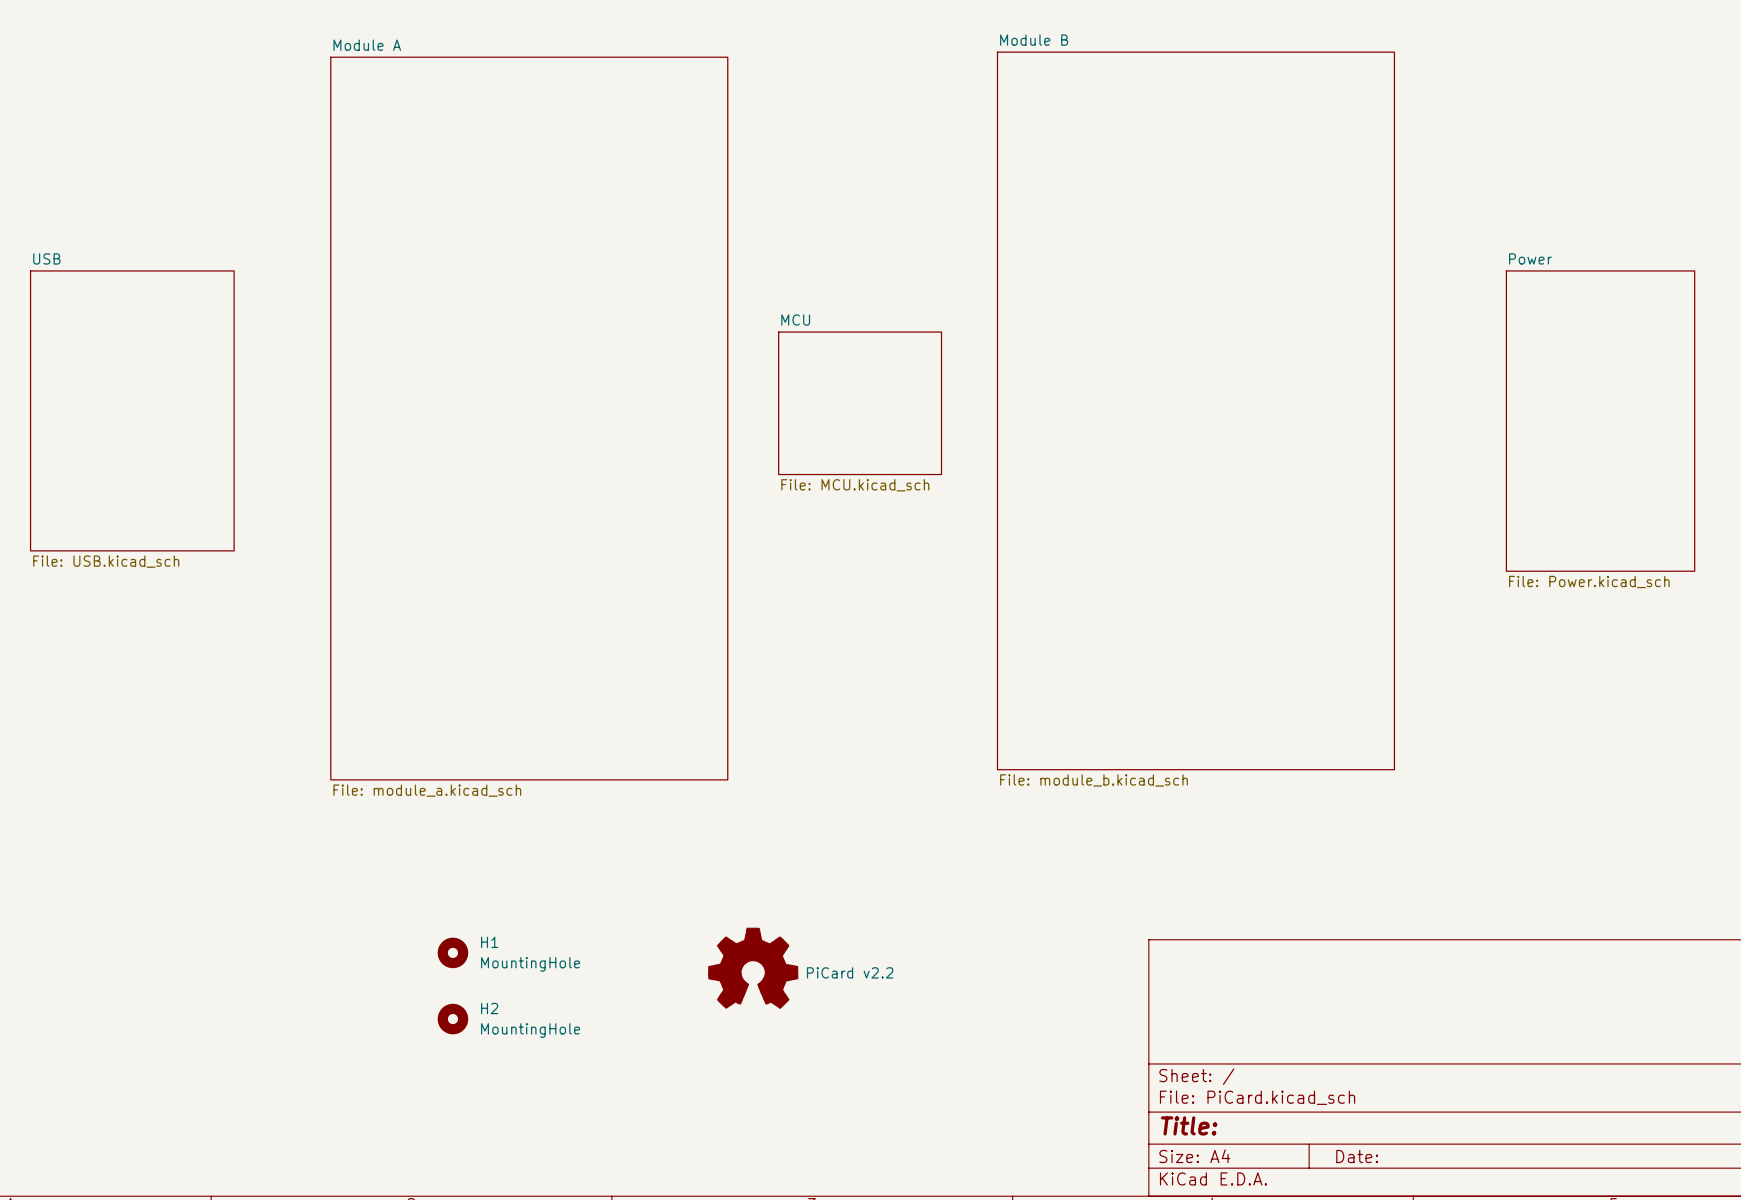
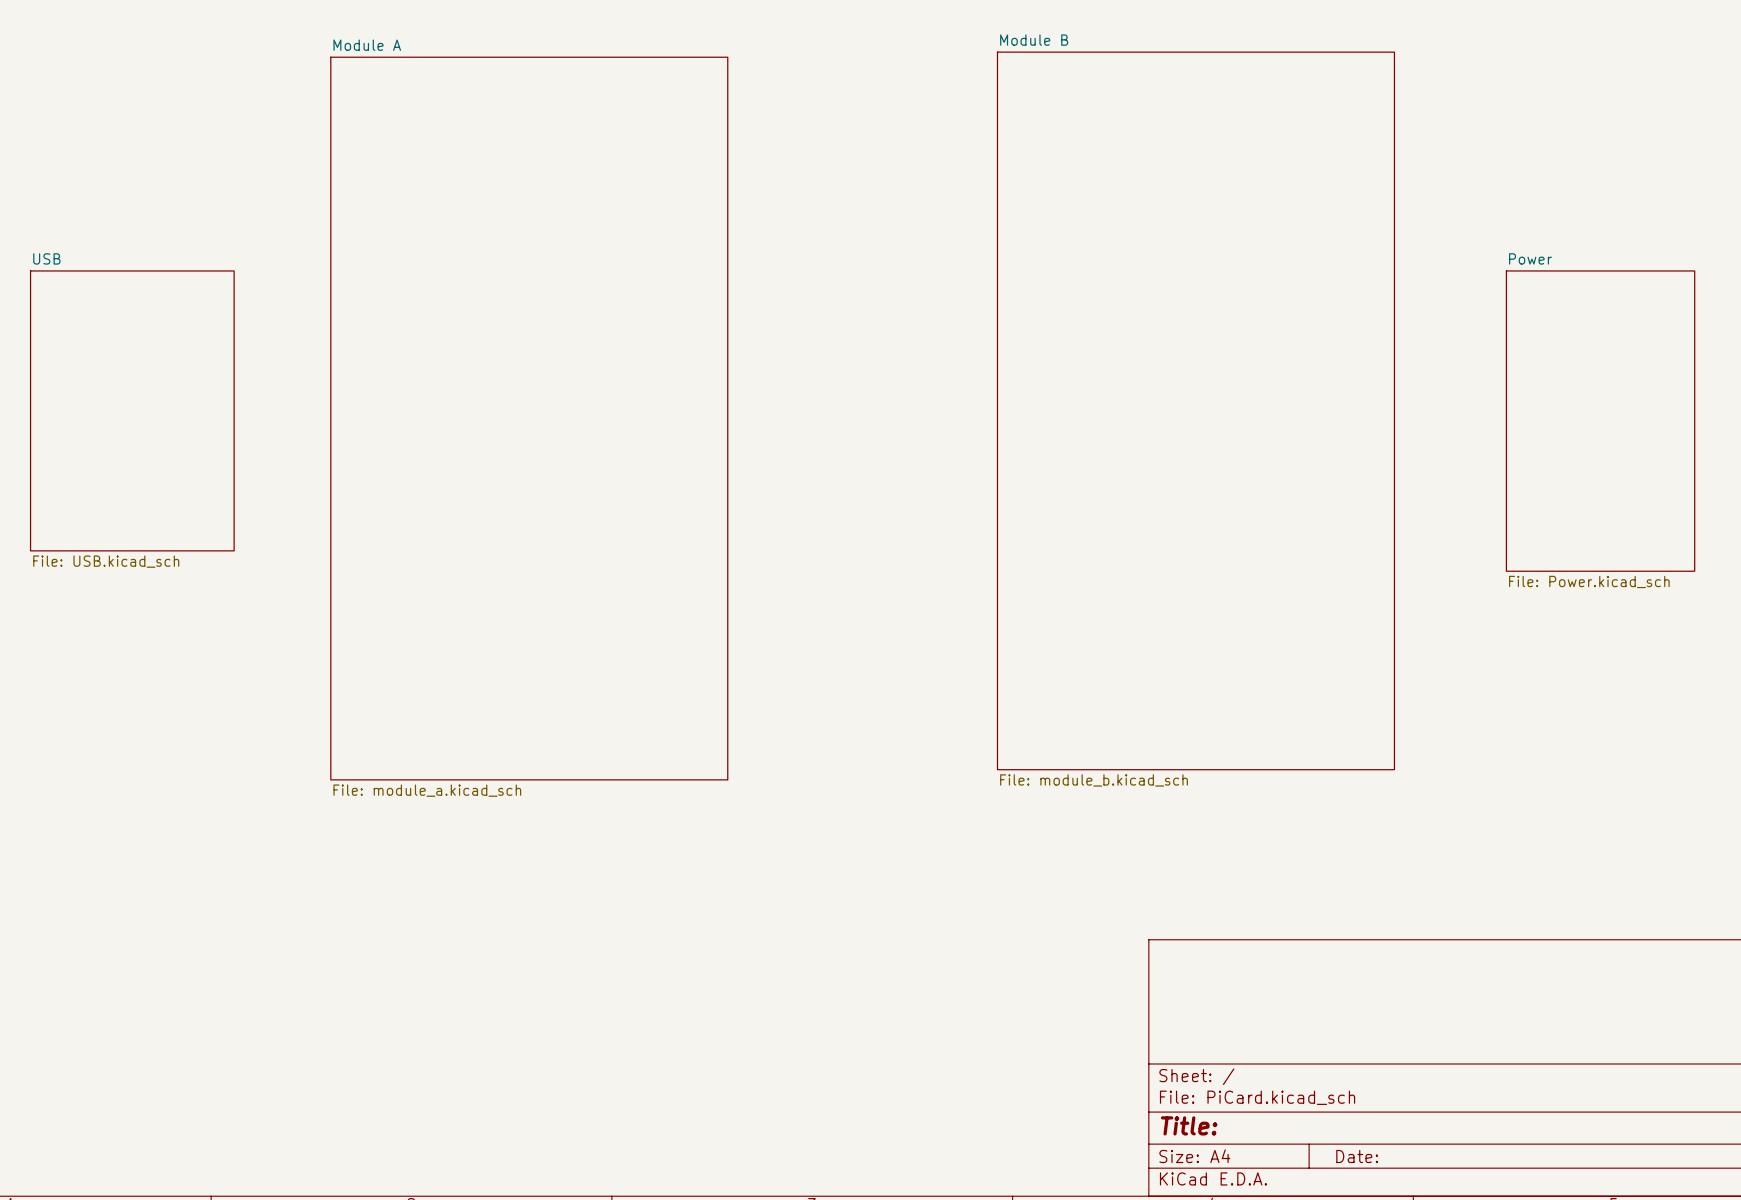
sheet MCU: File: MCU.kicad_sch (860, 403) -> none
H1: MountingHole (452, 952) -> none
part: PiCard v2.2 (753, 968) -> none
H2: MountingHole (452, 1019) -> none

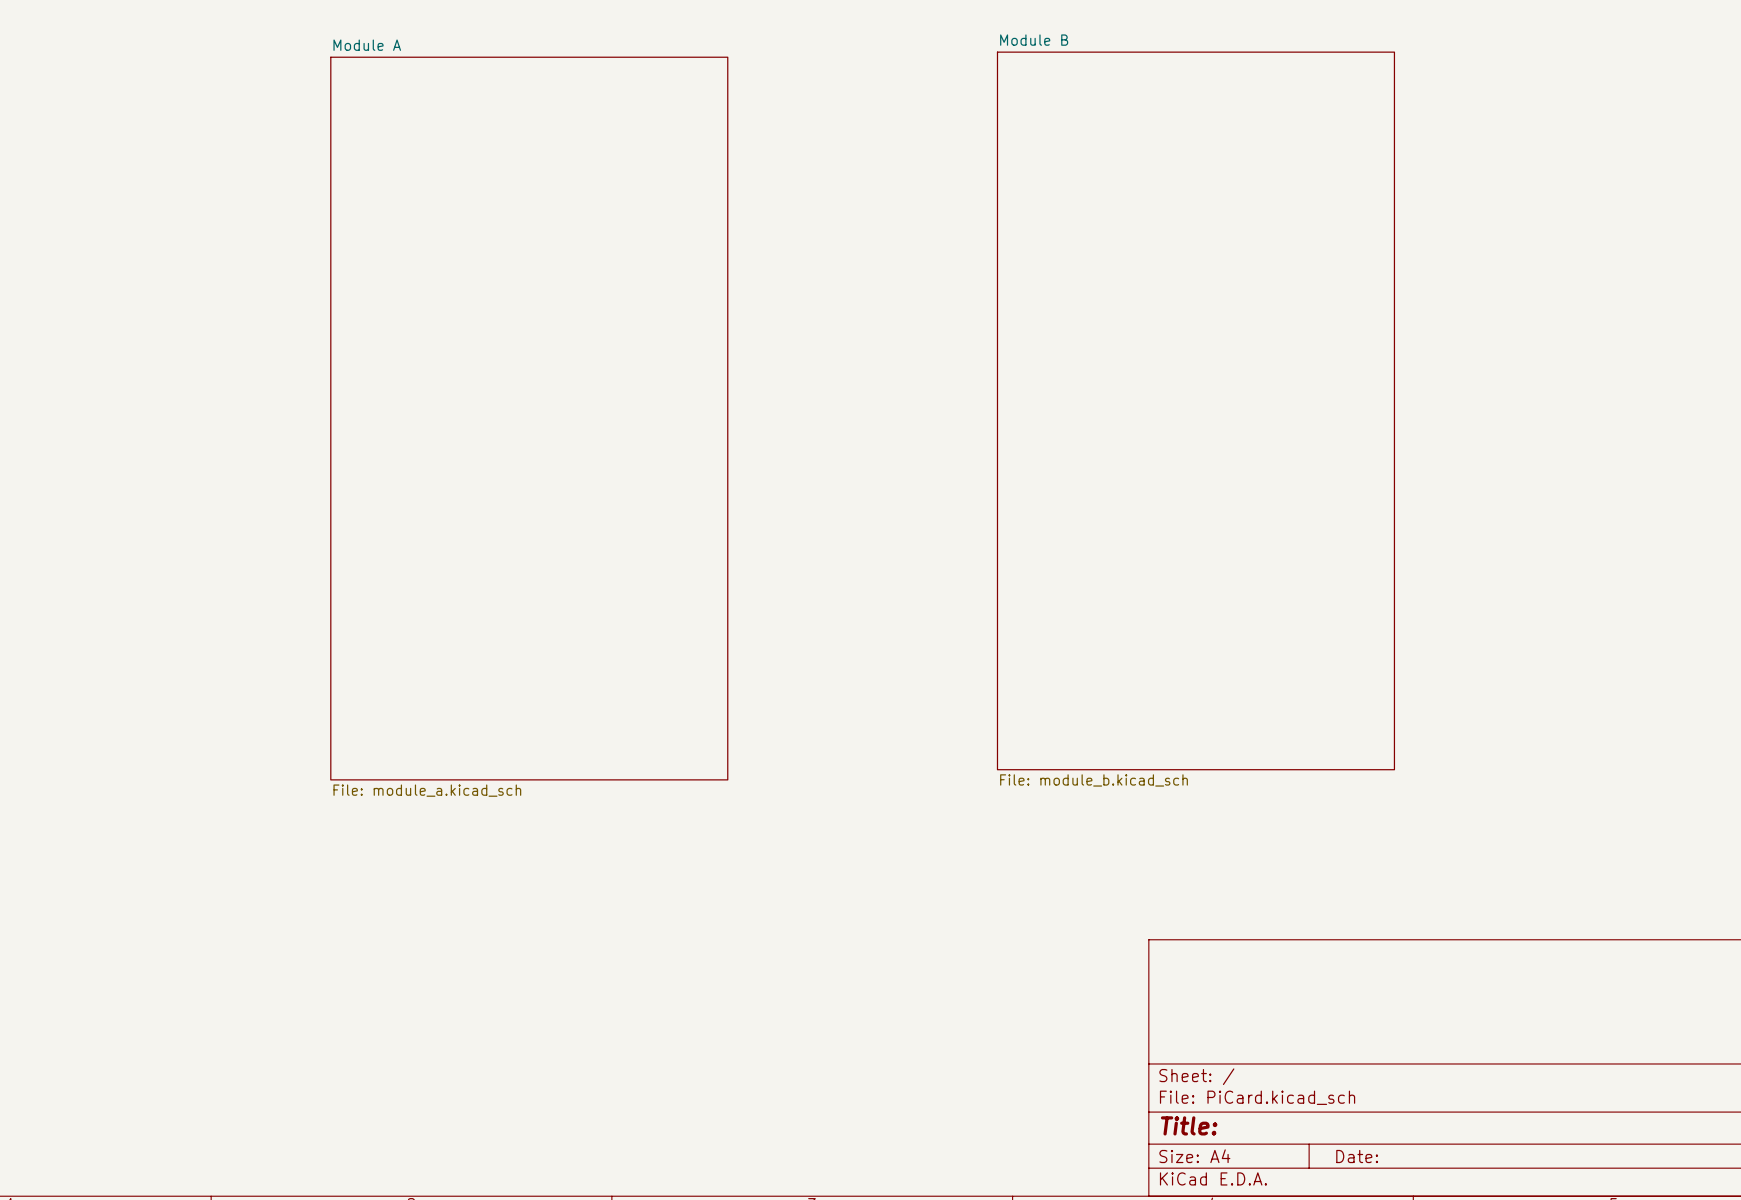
sheet USB: File: USB.kicad_sch (132, 410) -> none
sheet Power: File: Power.kicad_sch (1600, 421) -> none

